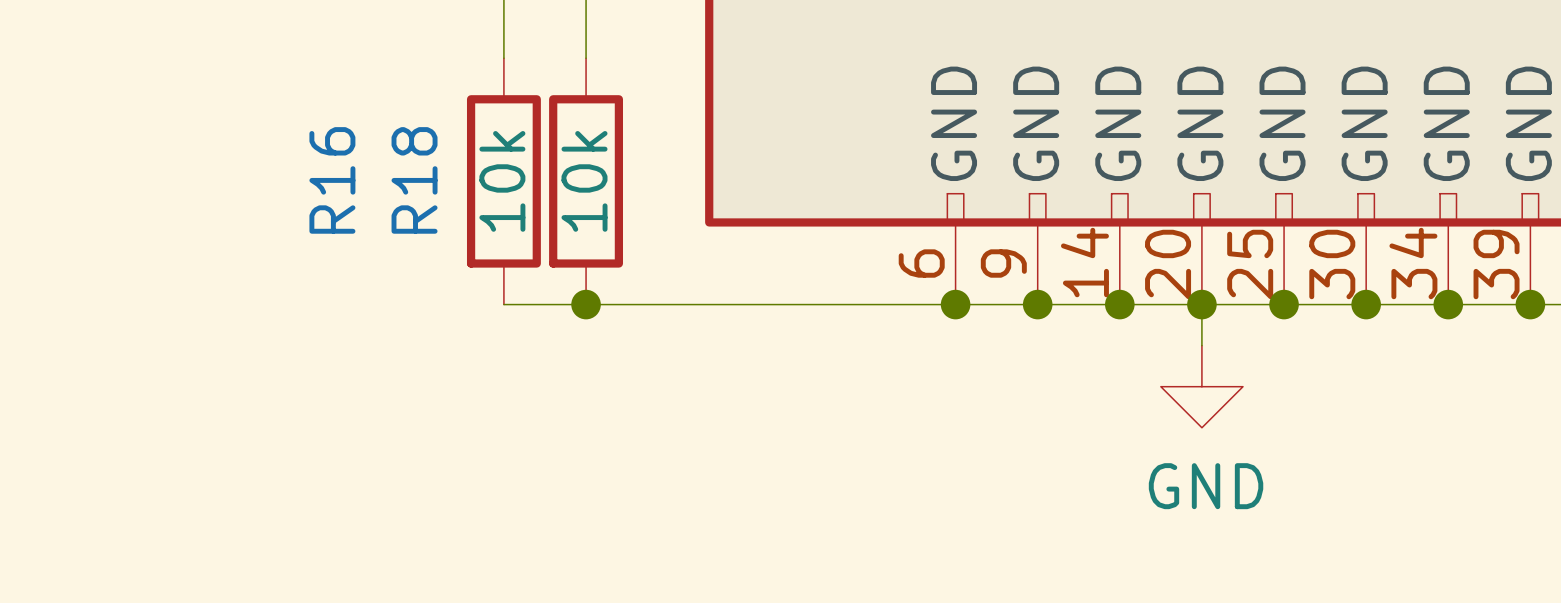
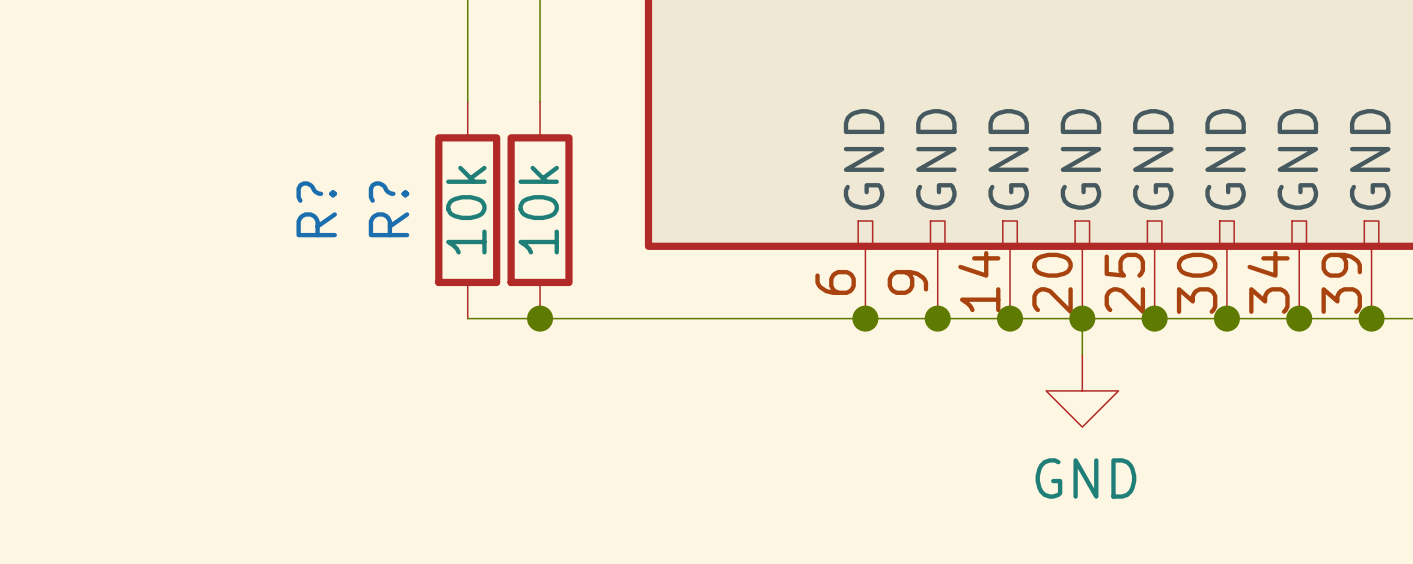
R16 name: R16 (332, 180) -> R? (316, 209)
R18 name: R18 (414, 180) -> R? (389, 209)

